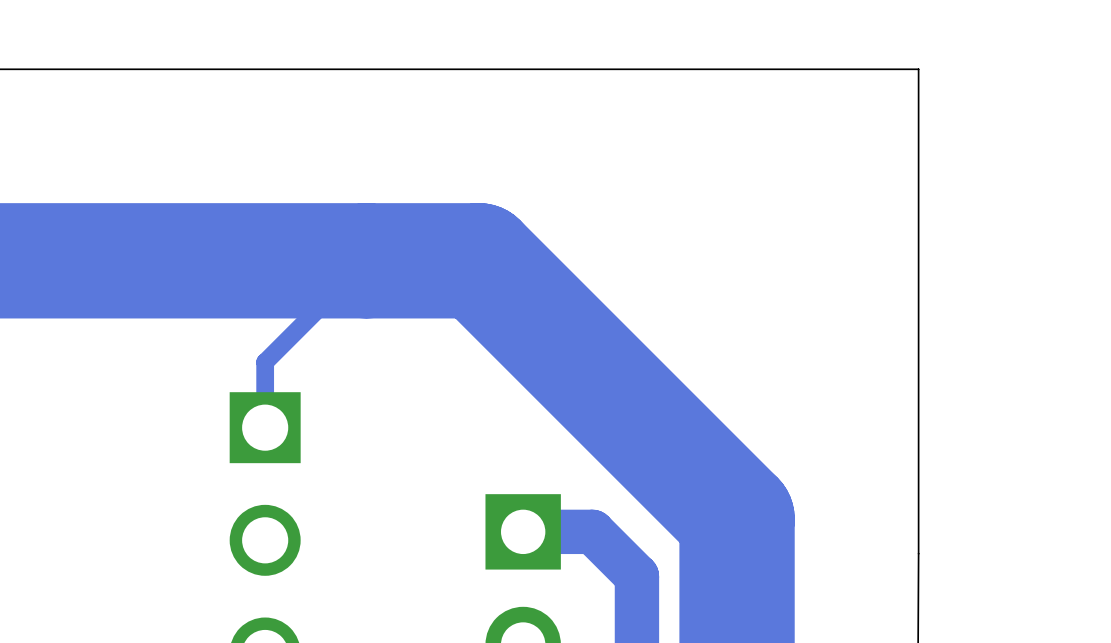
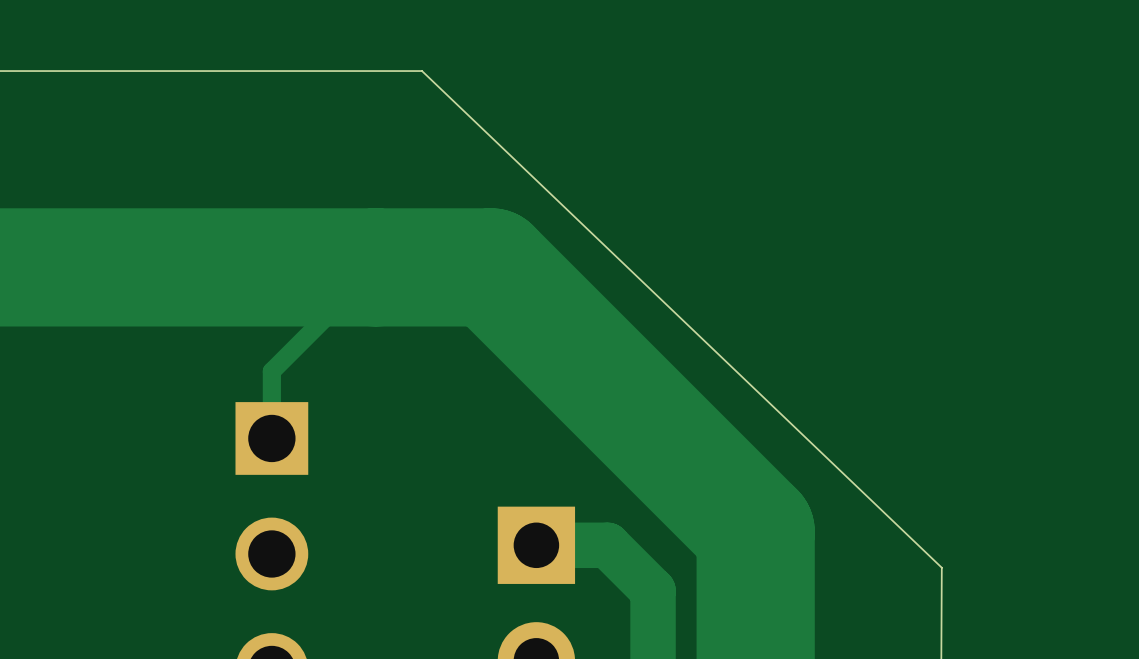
board edge: (411, 69) (918, 69) (918, 553) -> (422, 71) (941, 567)

